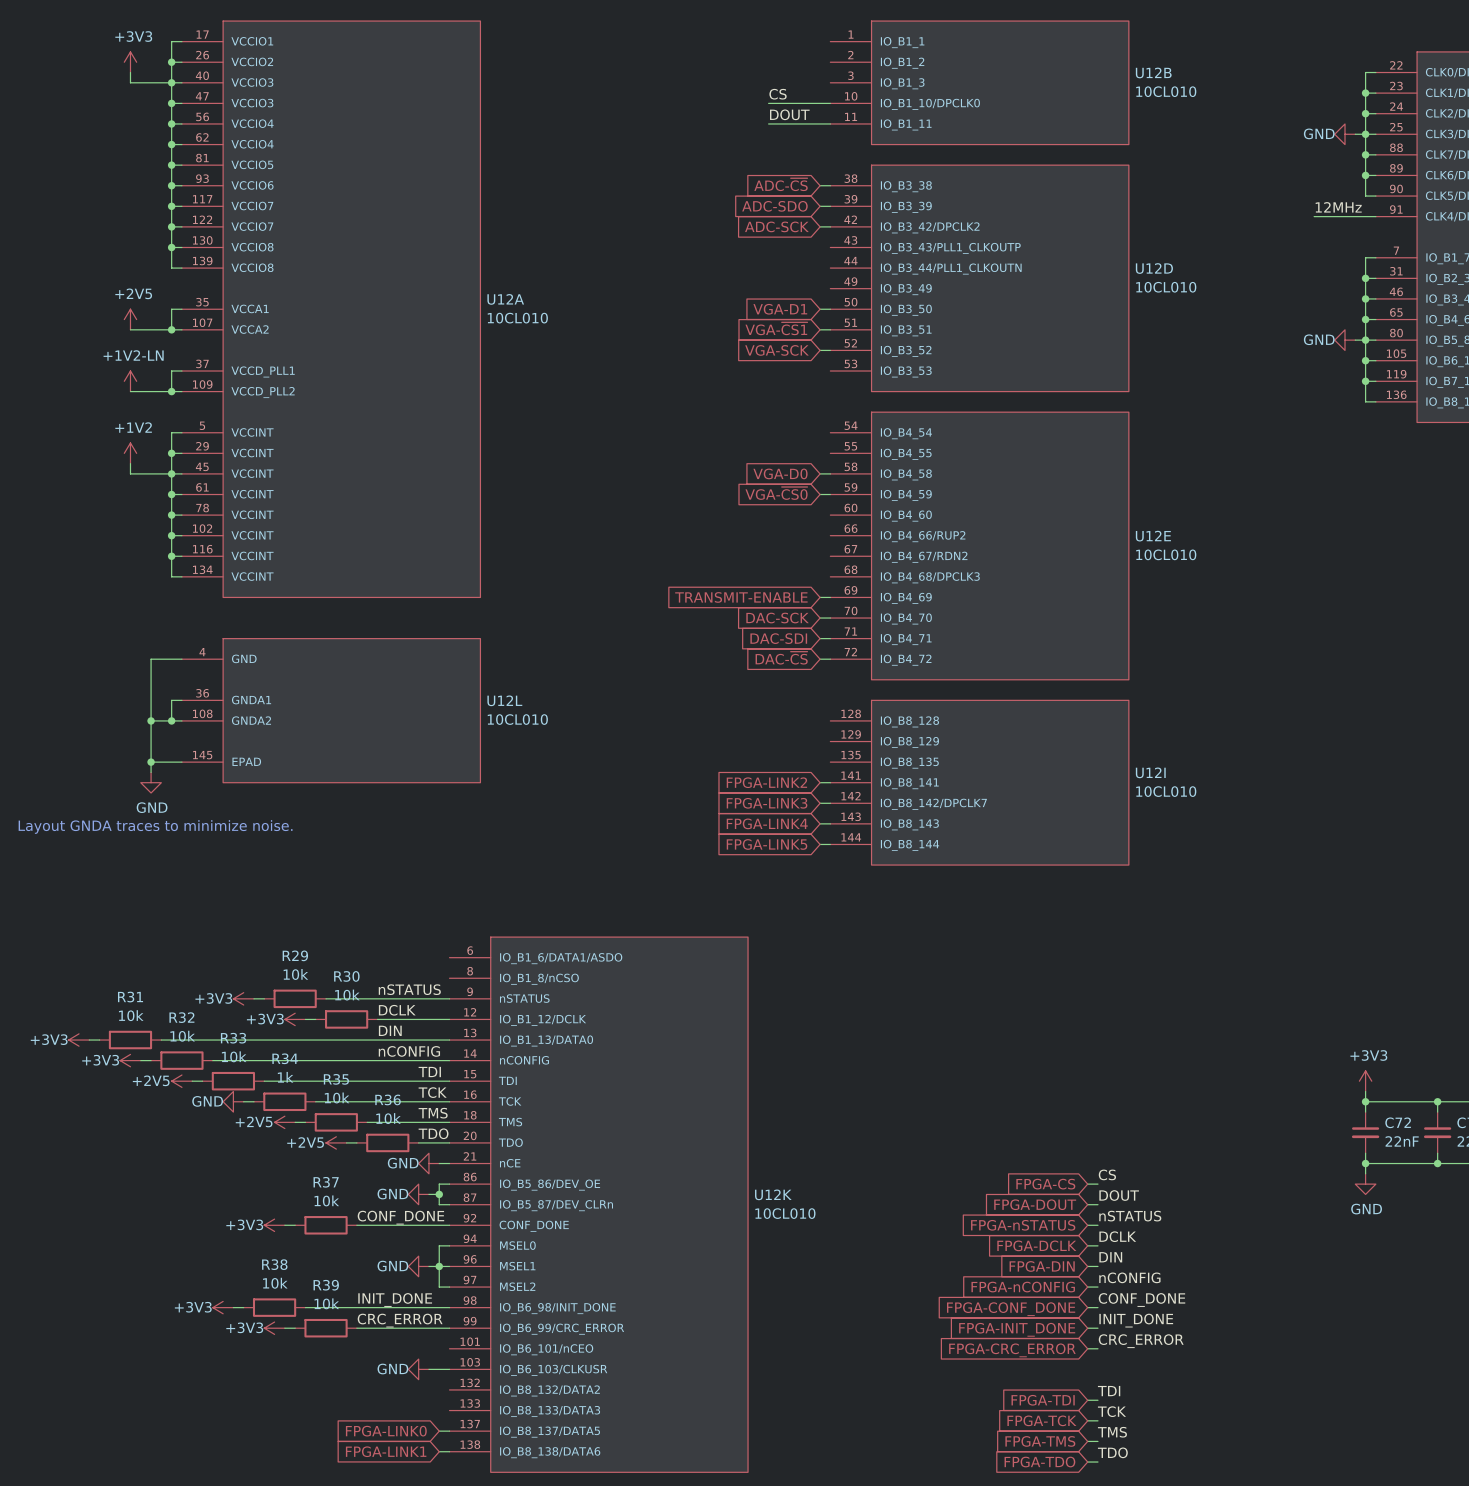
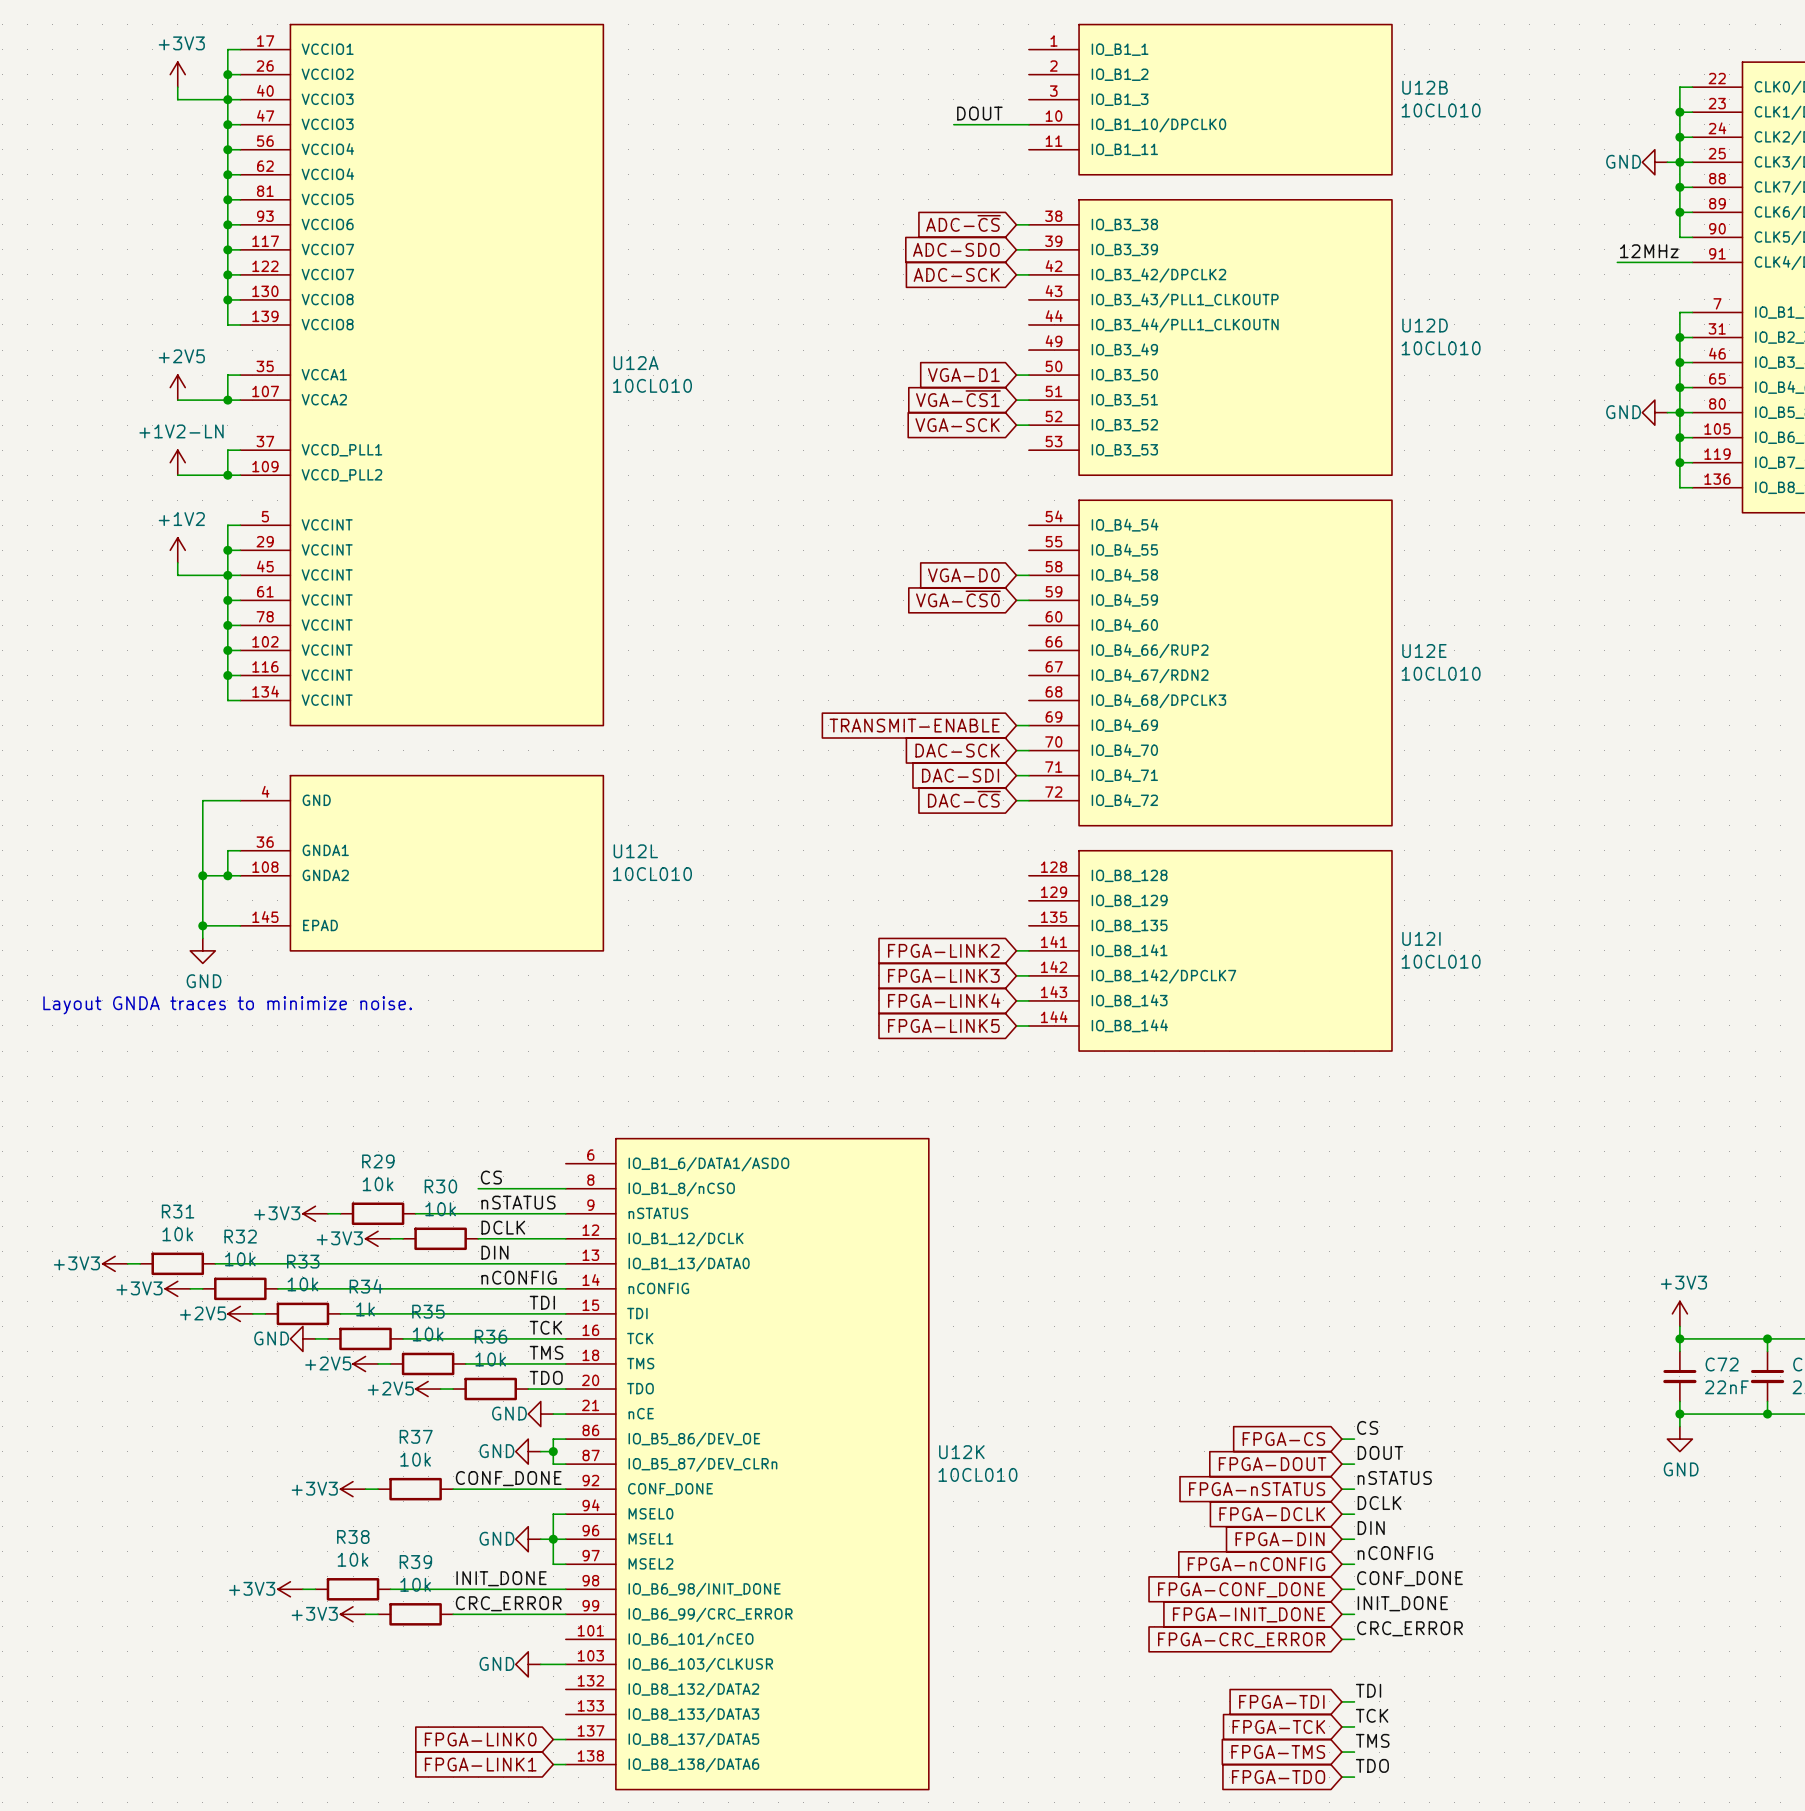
label: CS (778, 94) -> DOUT (979, 113)
label: DOUT (789, 114) -> none
wire: (768, 123) (830, 123) -> none
label: none -> CS (491, 1177)
wire: none -> (478, 1188) (565, 1188)

